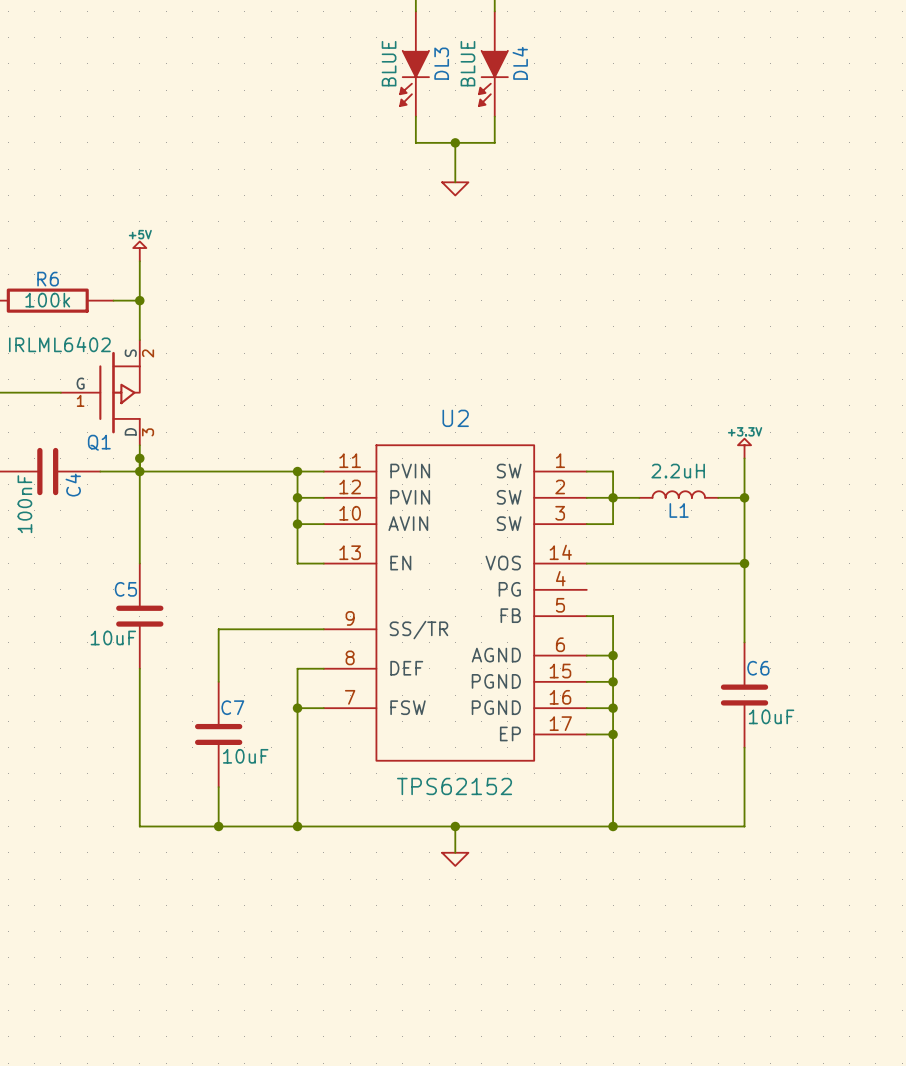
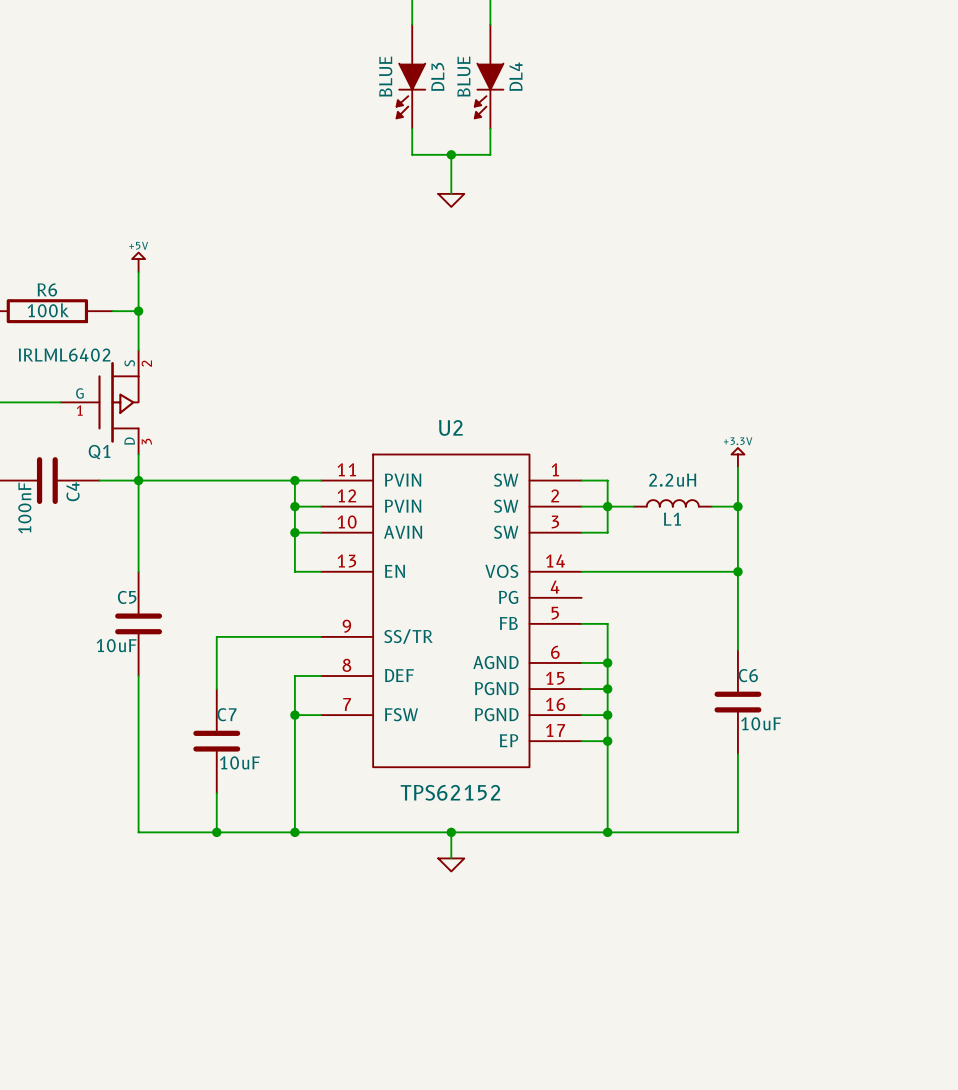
junction: (139, 458) -> none

